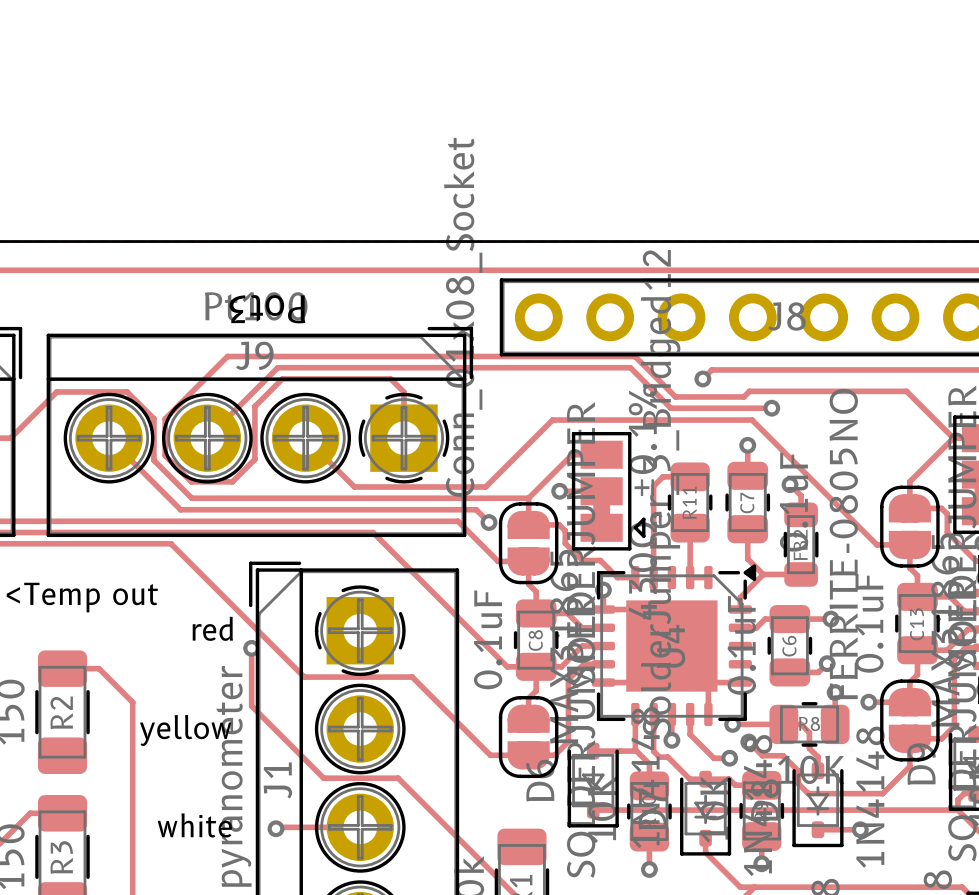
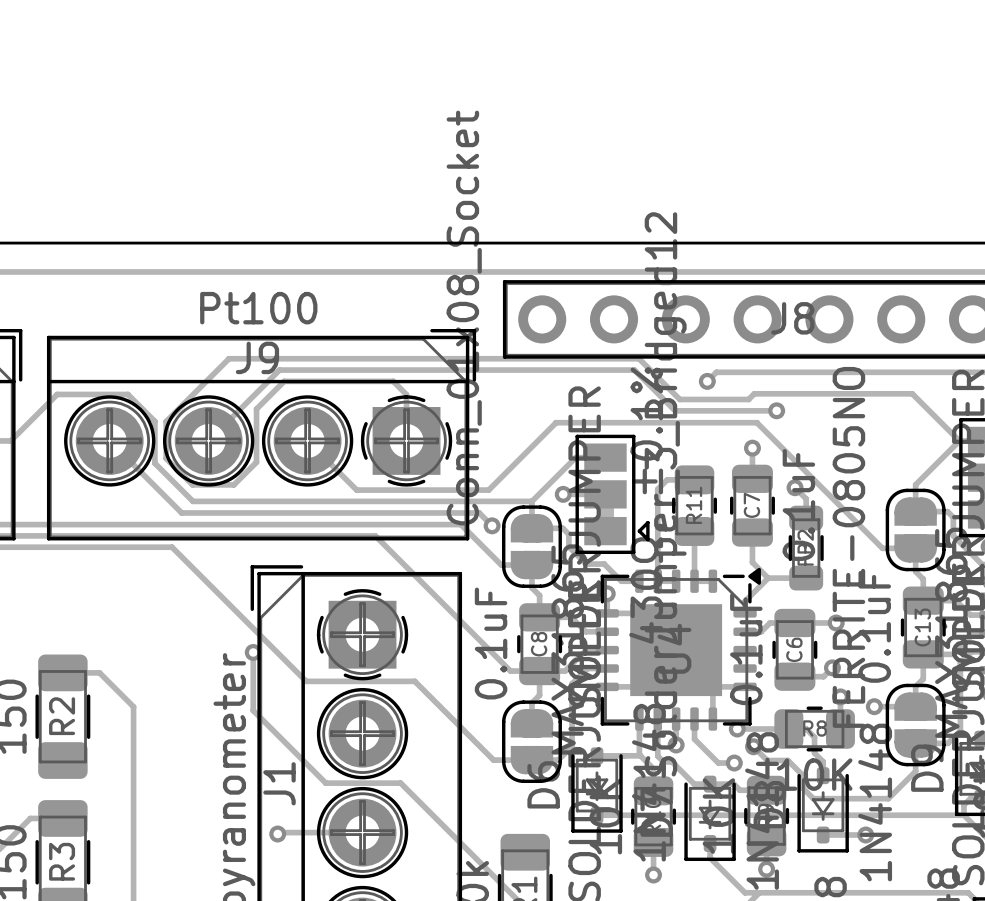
text: Pot3 (267, 309) -> none
text: <Temp out (82, 597) -> none
text: red (212, 628) -> none
text: yellow (185, 730) -> none
text: white (194, 825) -> none

